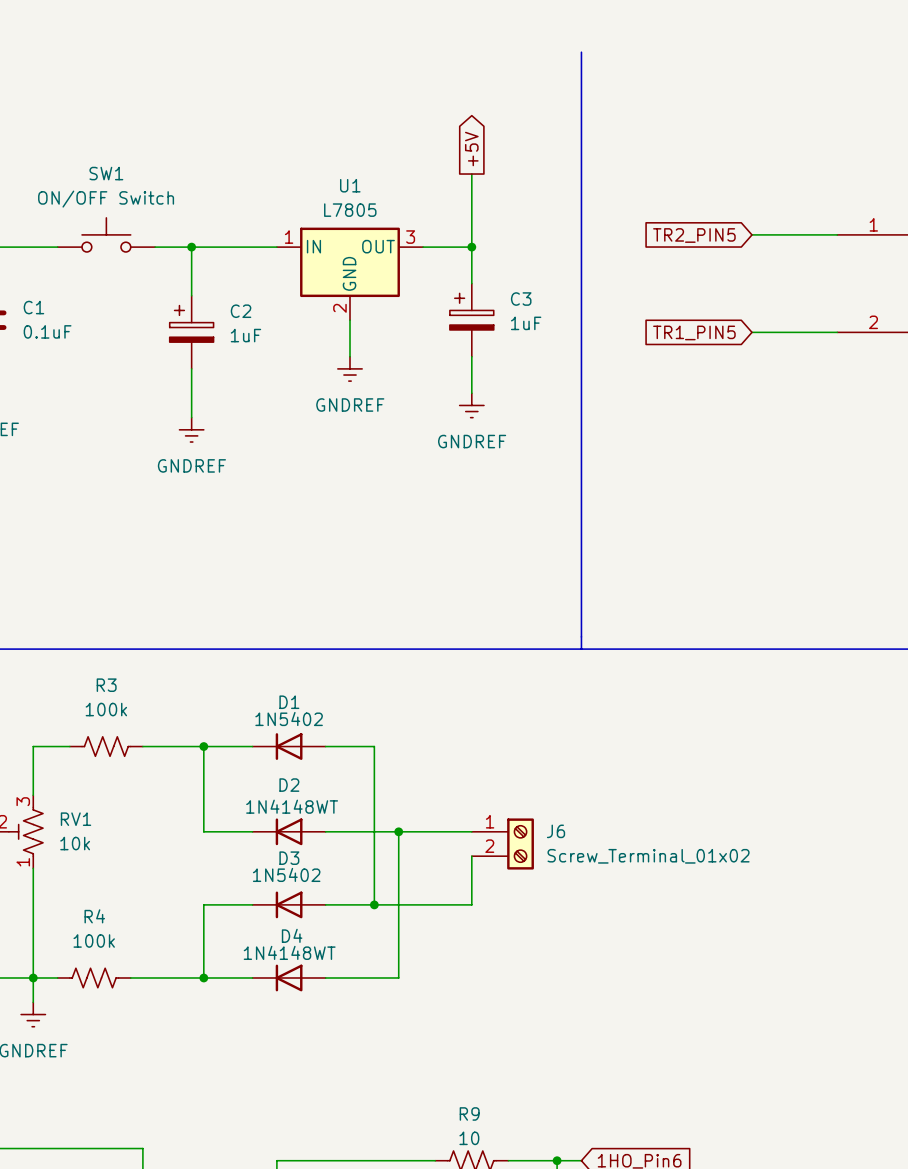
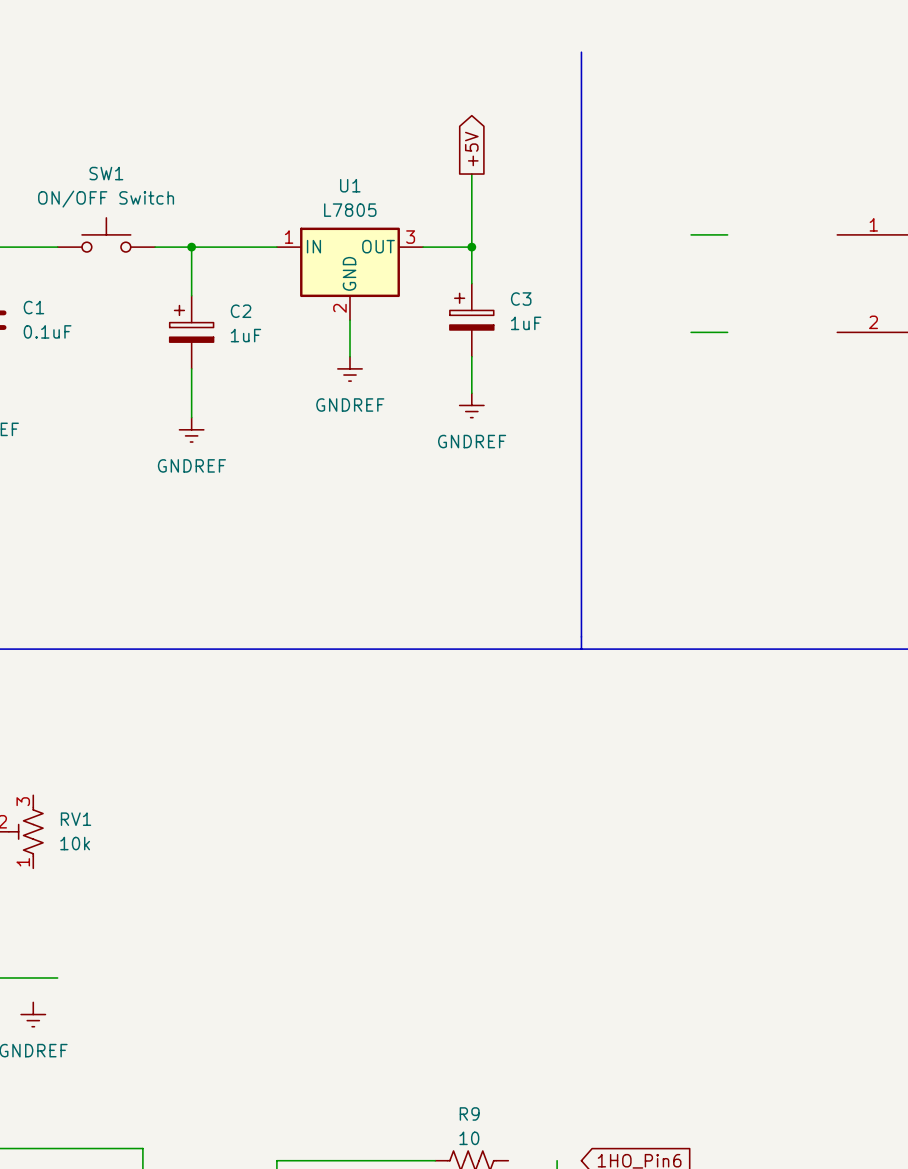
wire: none -> (691, 234) (727, 234)
wire: (751, 234) (837, 234) -> none
global label: TR2_PIN5 (694, 235) -> none
wire: none -> (691, 332) (727, 332)
global label: TR1_PIN5 (694, 332) -> none
wire: (751, 332) (837, 332) -> none
wire: (69, 746) (33, 746) (33, 795) -> none
R3: 100k (106, 746) -> none
wire: (142, 746) (252, 746) -> none
wire: (203, 746) (203, 831) (252, 831) -> none
junction: (203, 746) -> none
D1: 1N5402 (289, 746) -> none
wire: (325, 746) (374, 746) (374, 904) -> none
D2: 1N4148WT (289, 831) -> none
wire: (325, 831) (471, 831) -> none
wire: (398, 831) (398, 977) (325, 977) -> none
junction: (398, 831) -> none
J6: Screw_Terminal_01x02 (502, 844) -> none
wire: (471, 856) (471, 904) (325, 904) -> none
wire: (33, 868) (33, 1002) -> none
wire: (252, 904) (203, 904) (203, 977) -> none
D3: 1N5402 (289, 904) -> none
junction: (374, 904) -> none
junction: (33, 977) -> none
R4: 100k (94, 977) -> none
wire: (130, 977) (252, 977) -> none
junction: (203, 977) -> none
D4: 1N4148WT (289, 977) -> none
wire: (508, 1160) (581, 1160) -> none
junction: (557, 1160) -> none

